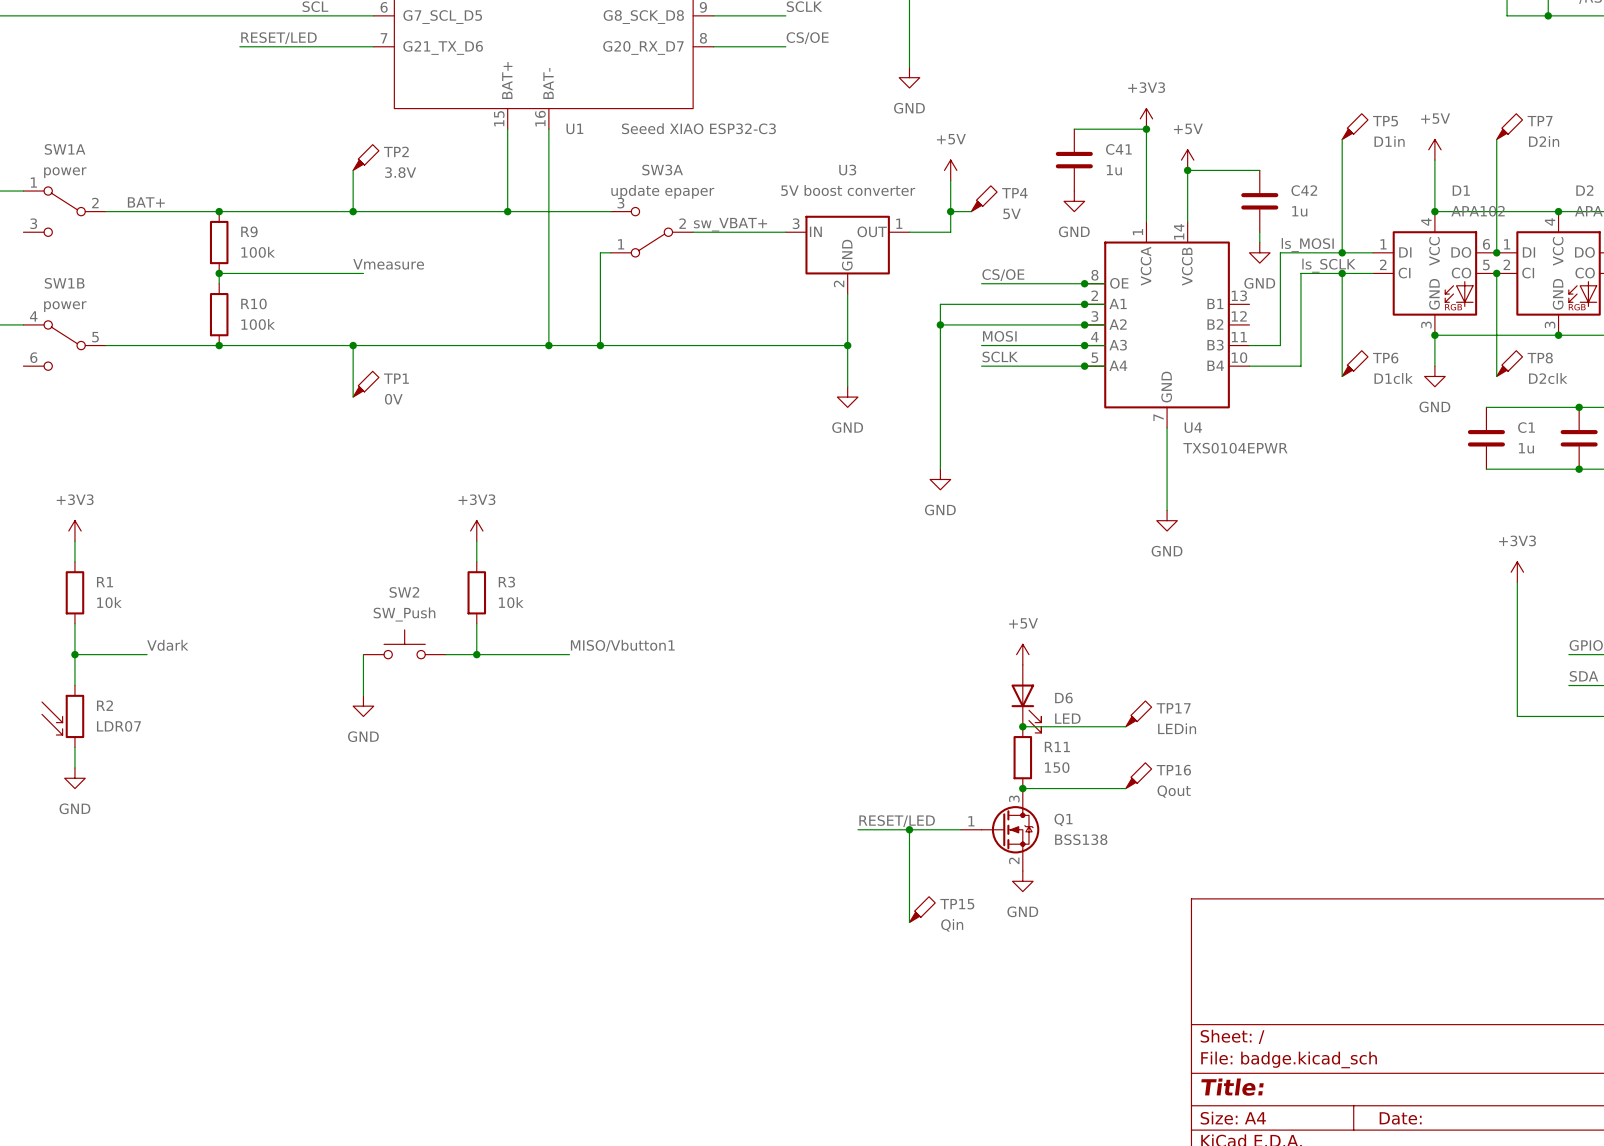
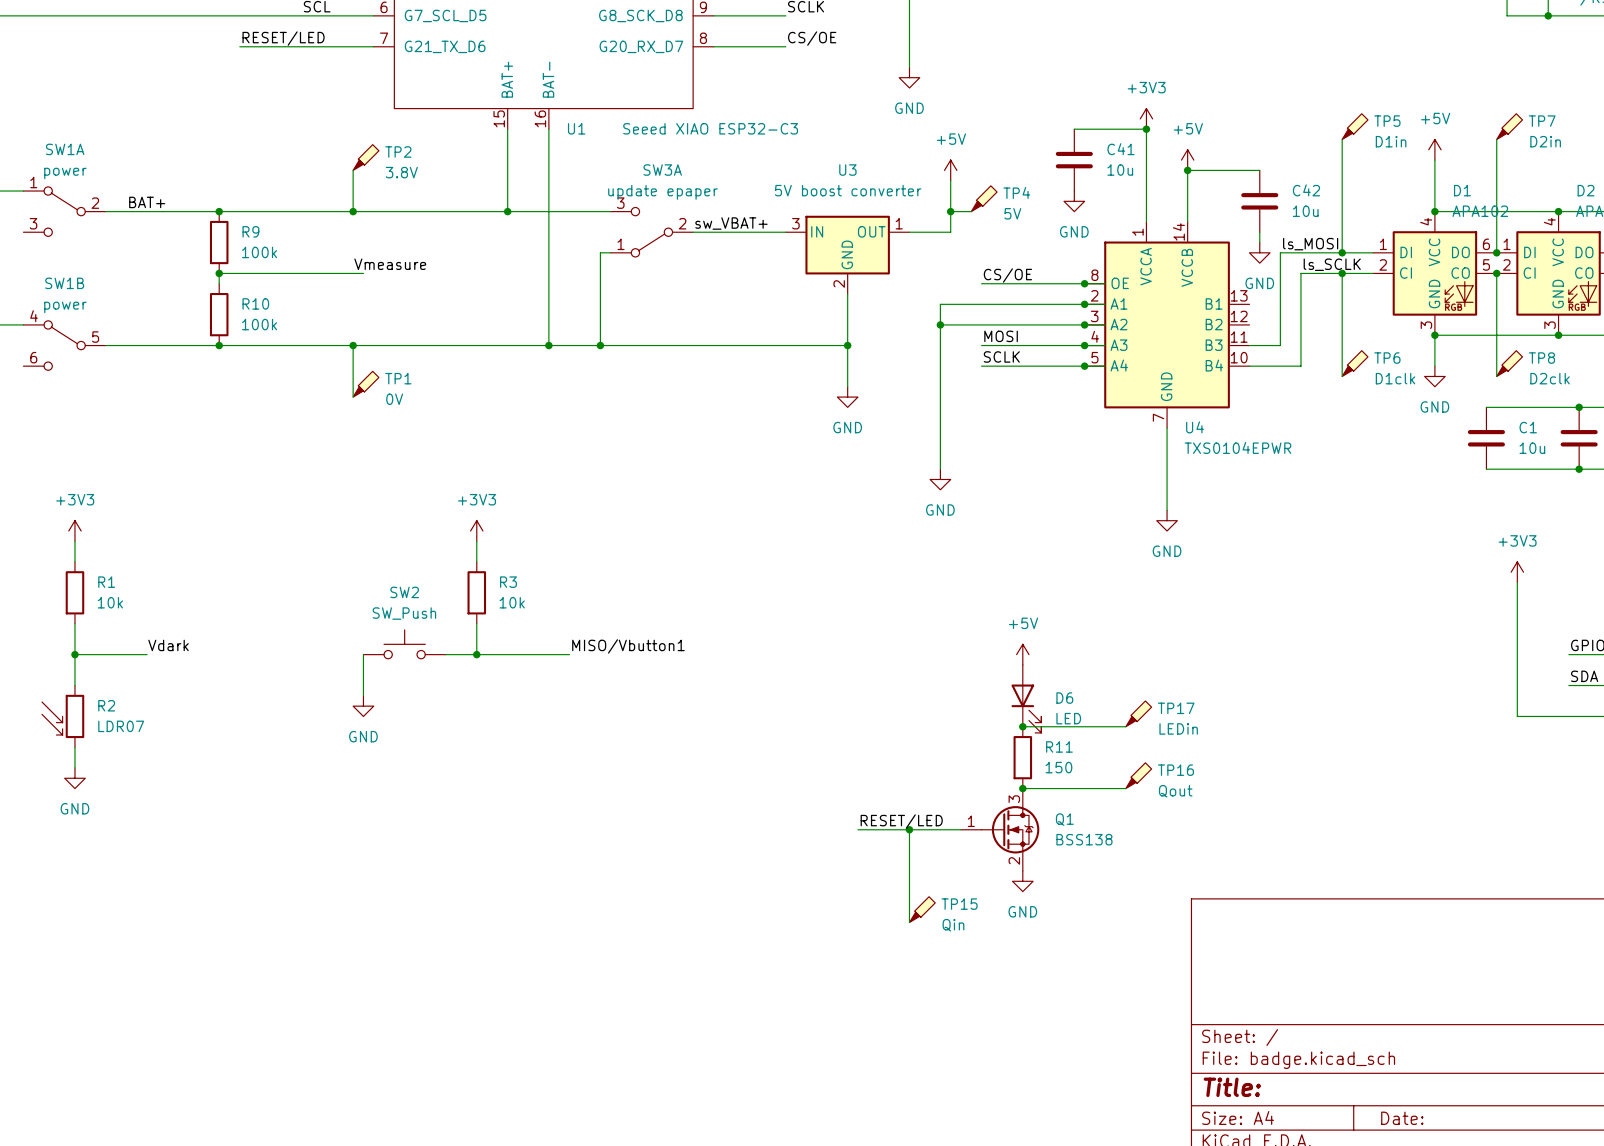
C41 value: 1u (1114, 170) -> 10u (1120, 170)
C42 value: 1u (1299, 211) -> 10u (1305, 211)
C1 value: 1u (1526, 448) -> 10u (1532, 448)

